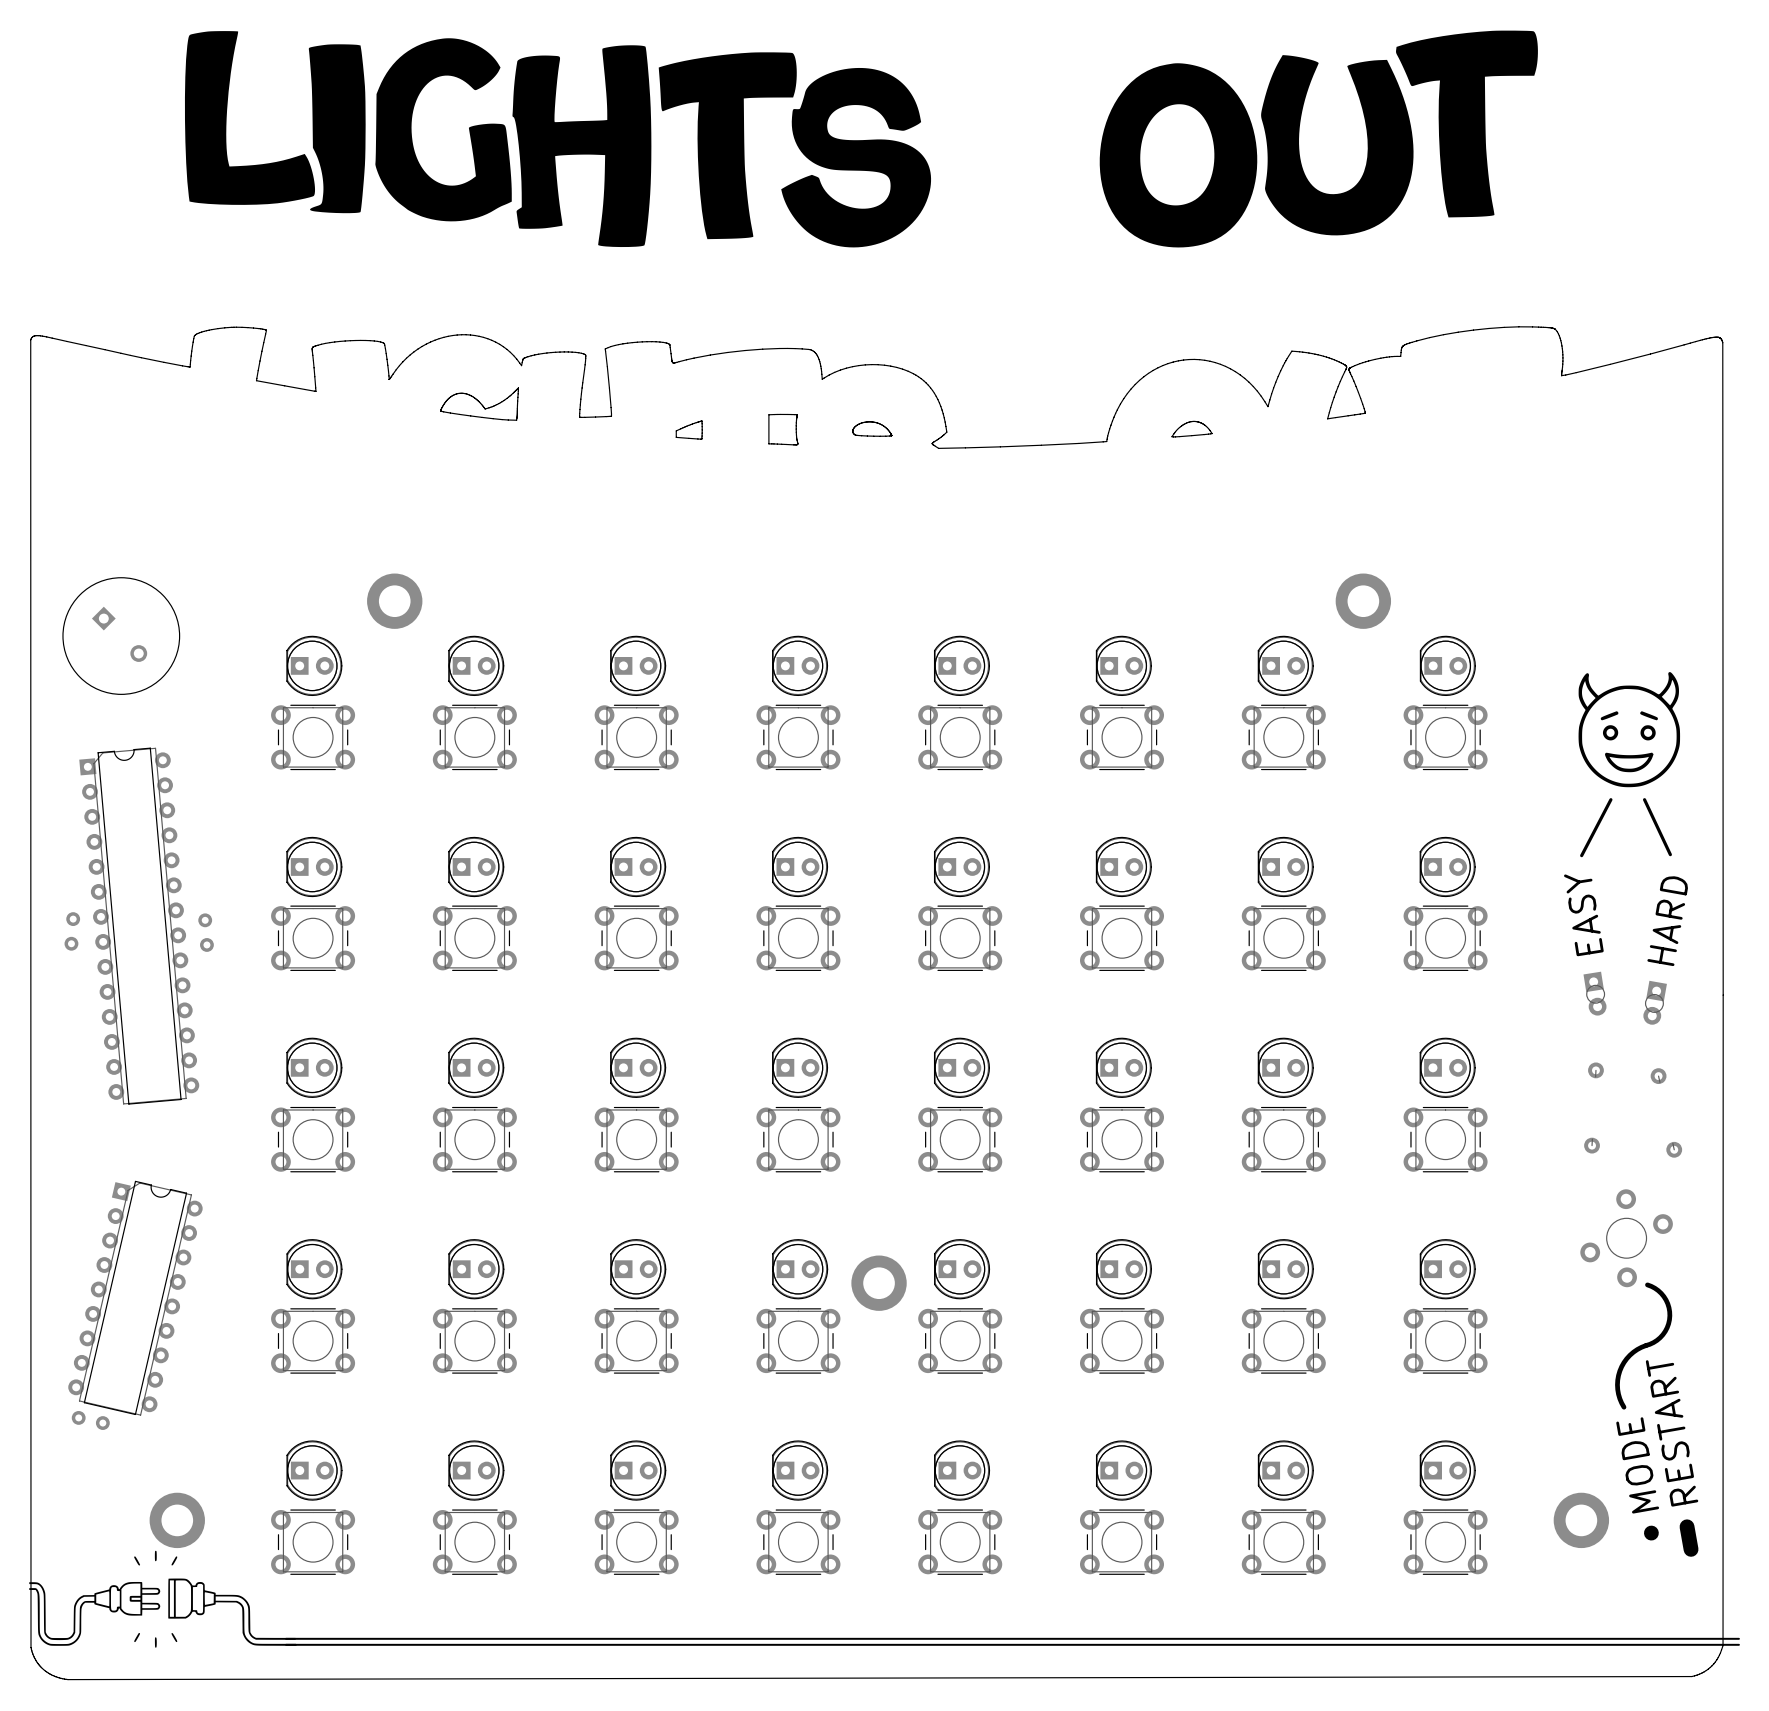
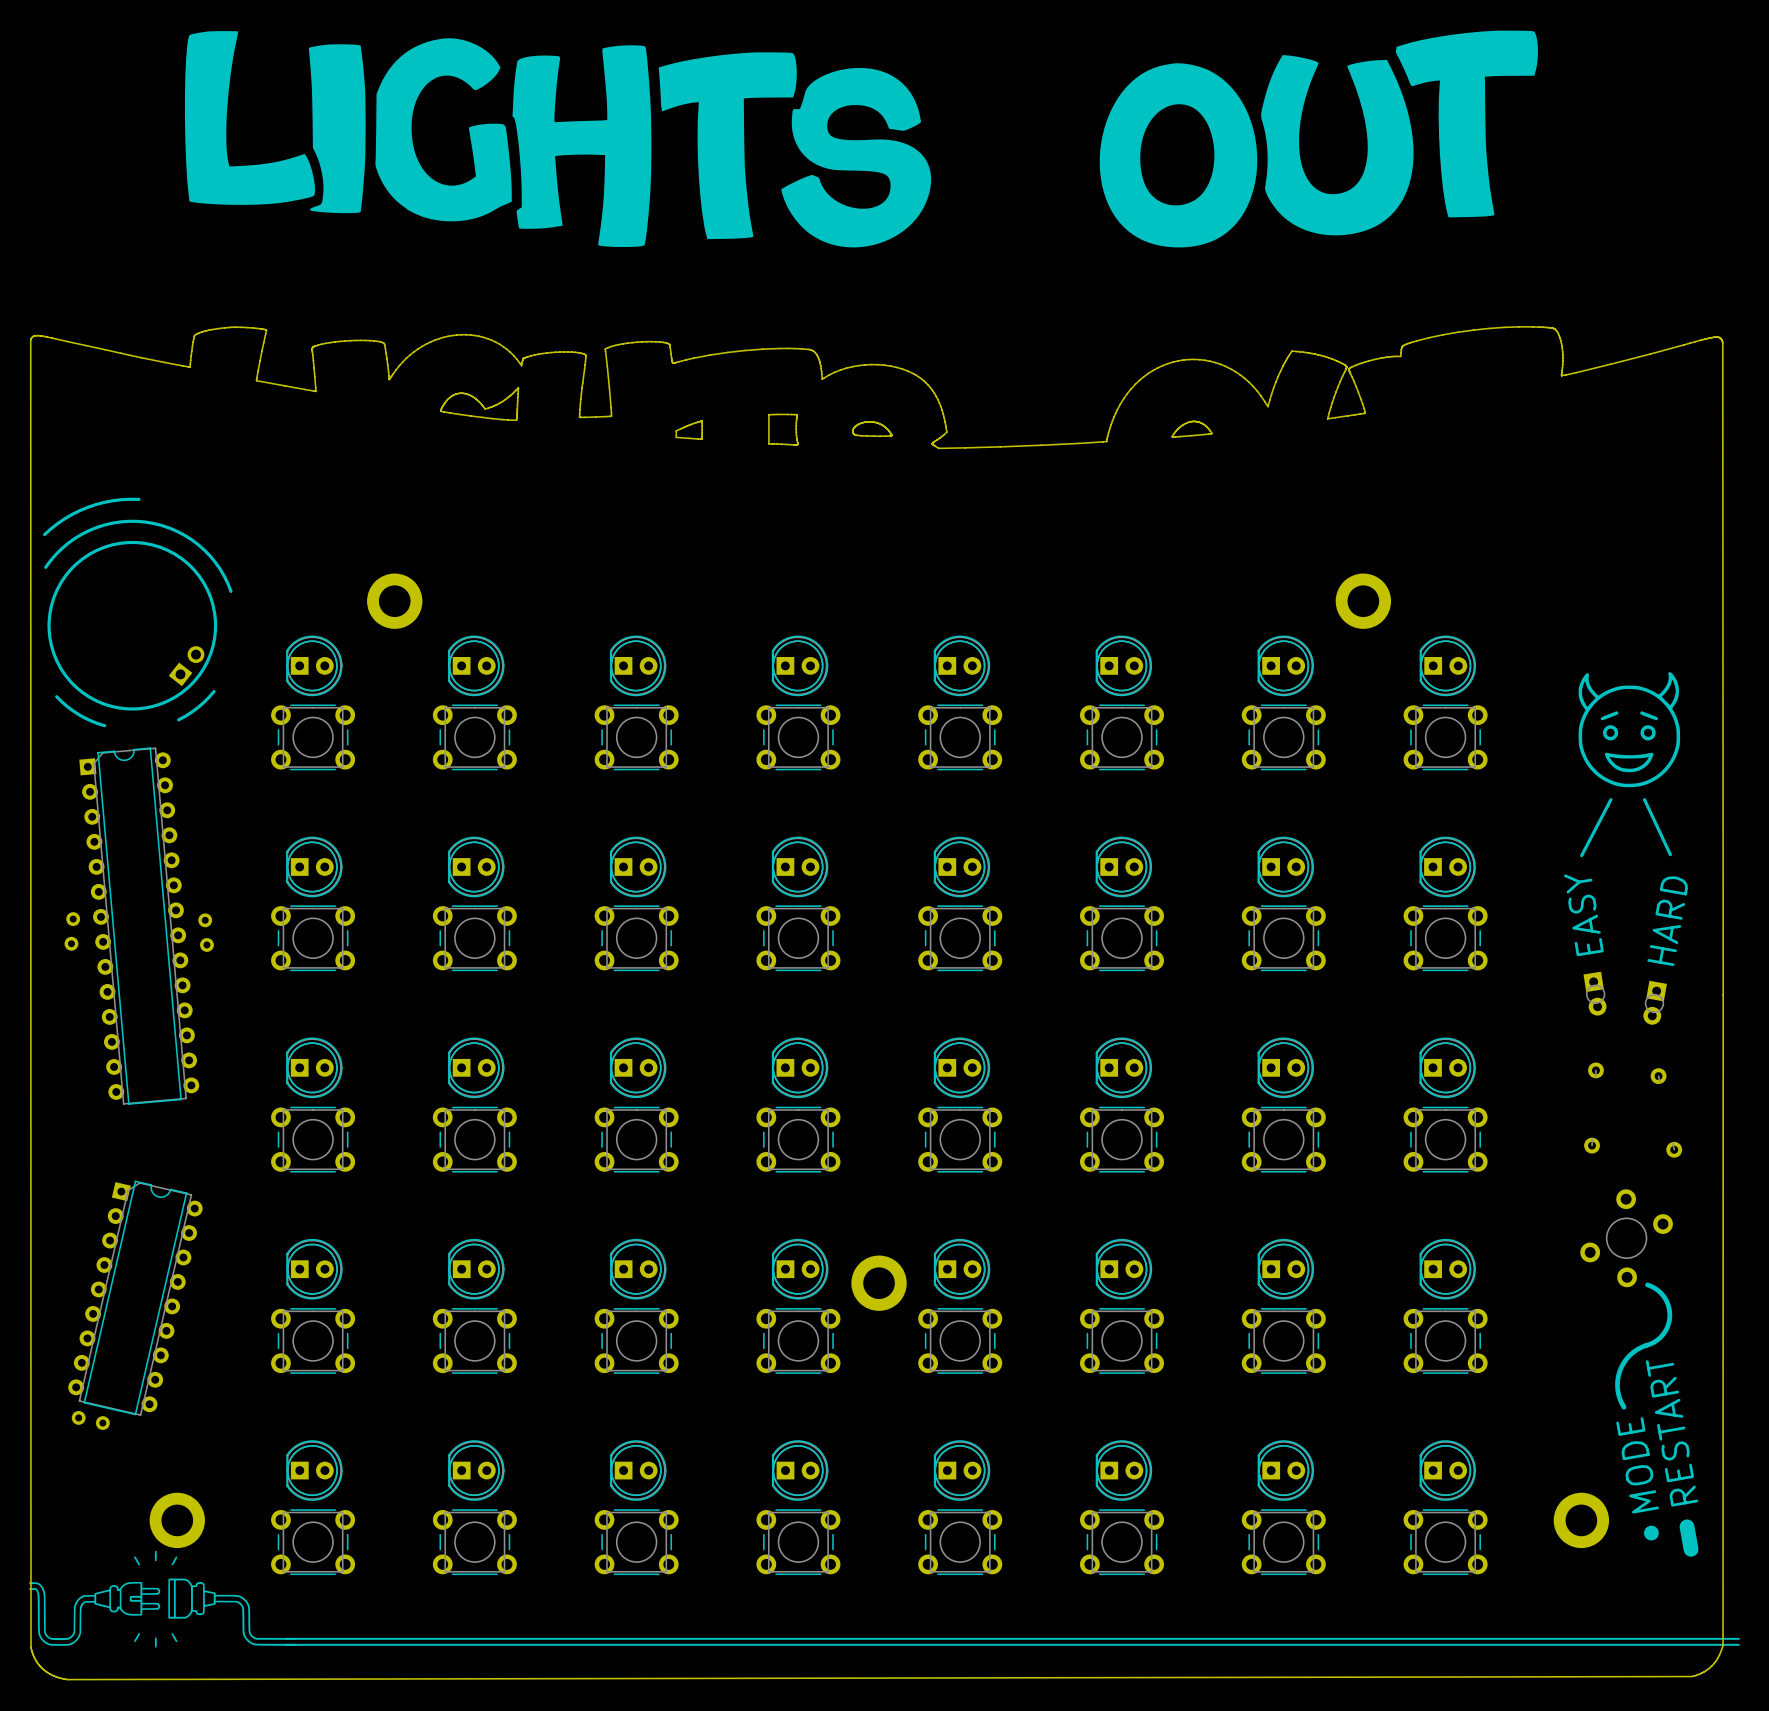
line: none -> (138, 499) (113, 500) (88, 507) (64, 518) (44, 534)
drawing: none -> [47, 540, 218, 711]
line: none -> (45, 567) (61, 548) (89, 530) (121, 521) (145, 522) (177, 531) (198, 544) (215, 562) (230, 591)
part: (121, 636) -> none
part: none -> (186, 666)
line: none -> (214, 691) (197, 707) (178, 719)
line: none -> (56, 696) (78, 714) (104, 725)

